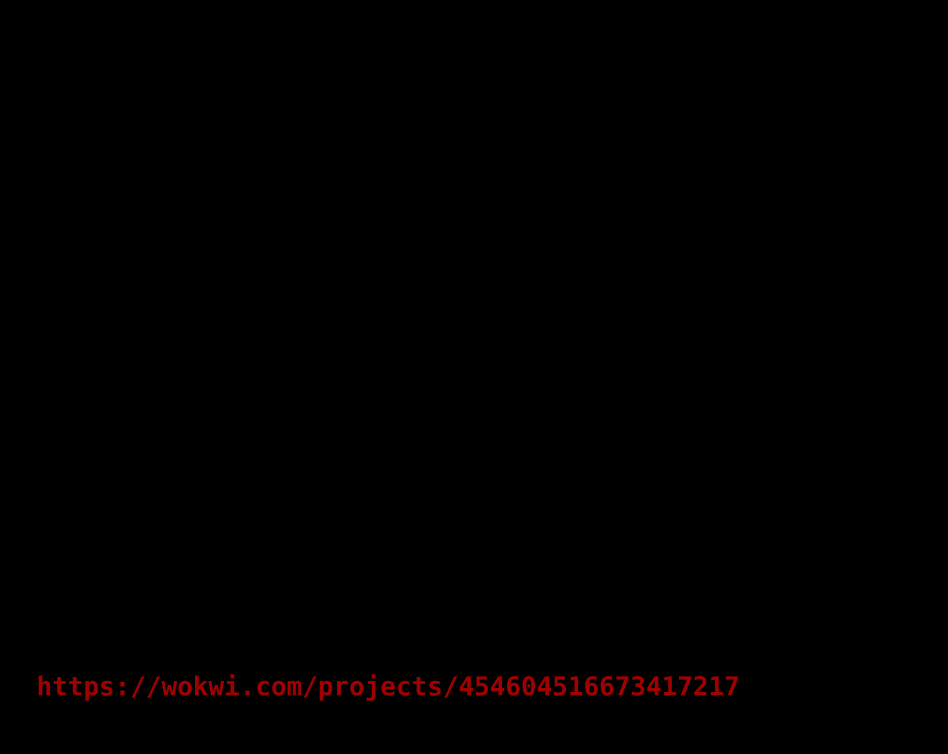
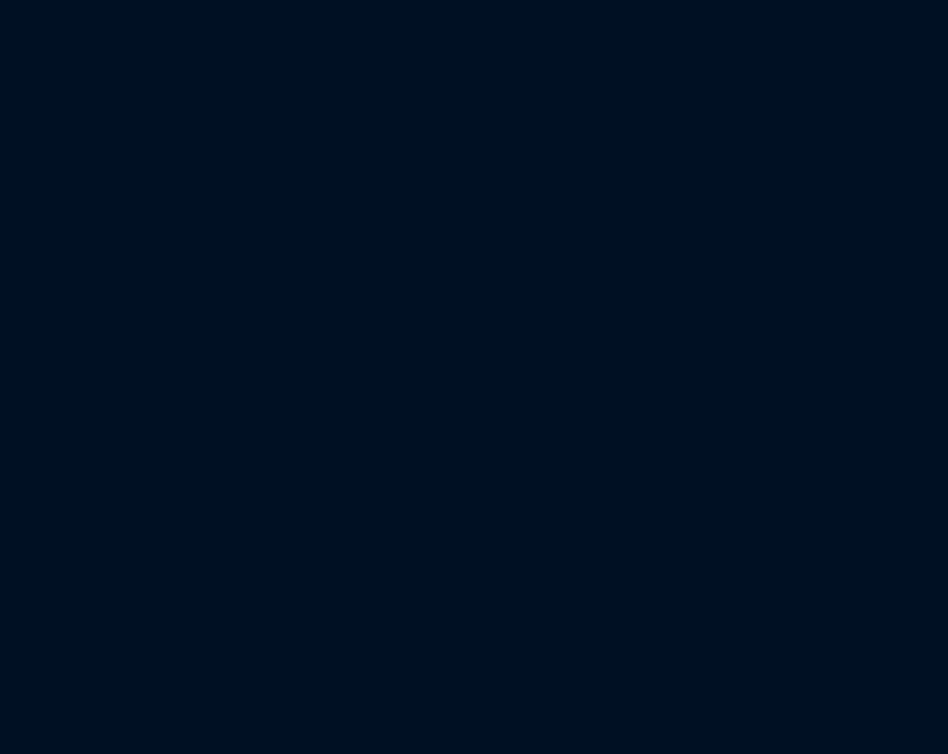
text: https://wokwi.com/projects/454604516673417217 (388, 687) -> none

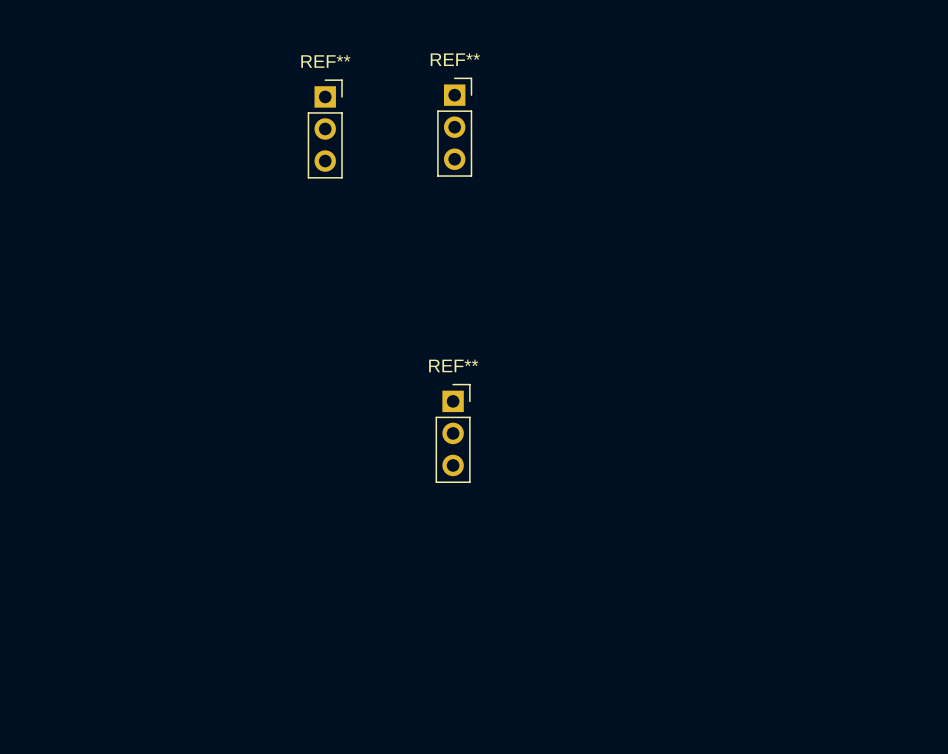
REF**: none -> (454, 127)
REF**: none -> (325, 128)
REF**: none -> (453, 433)

